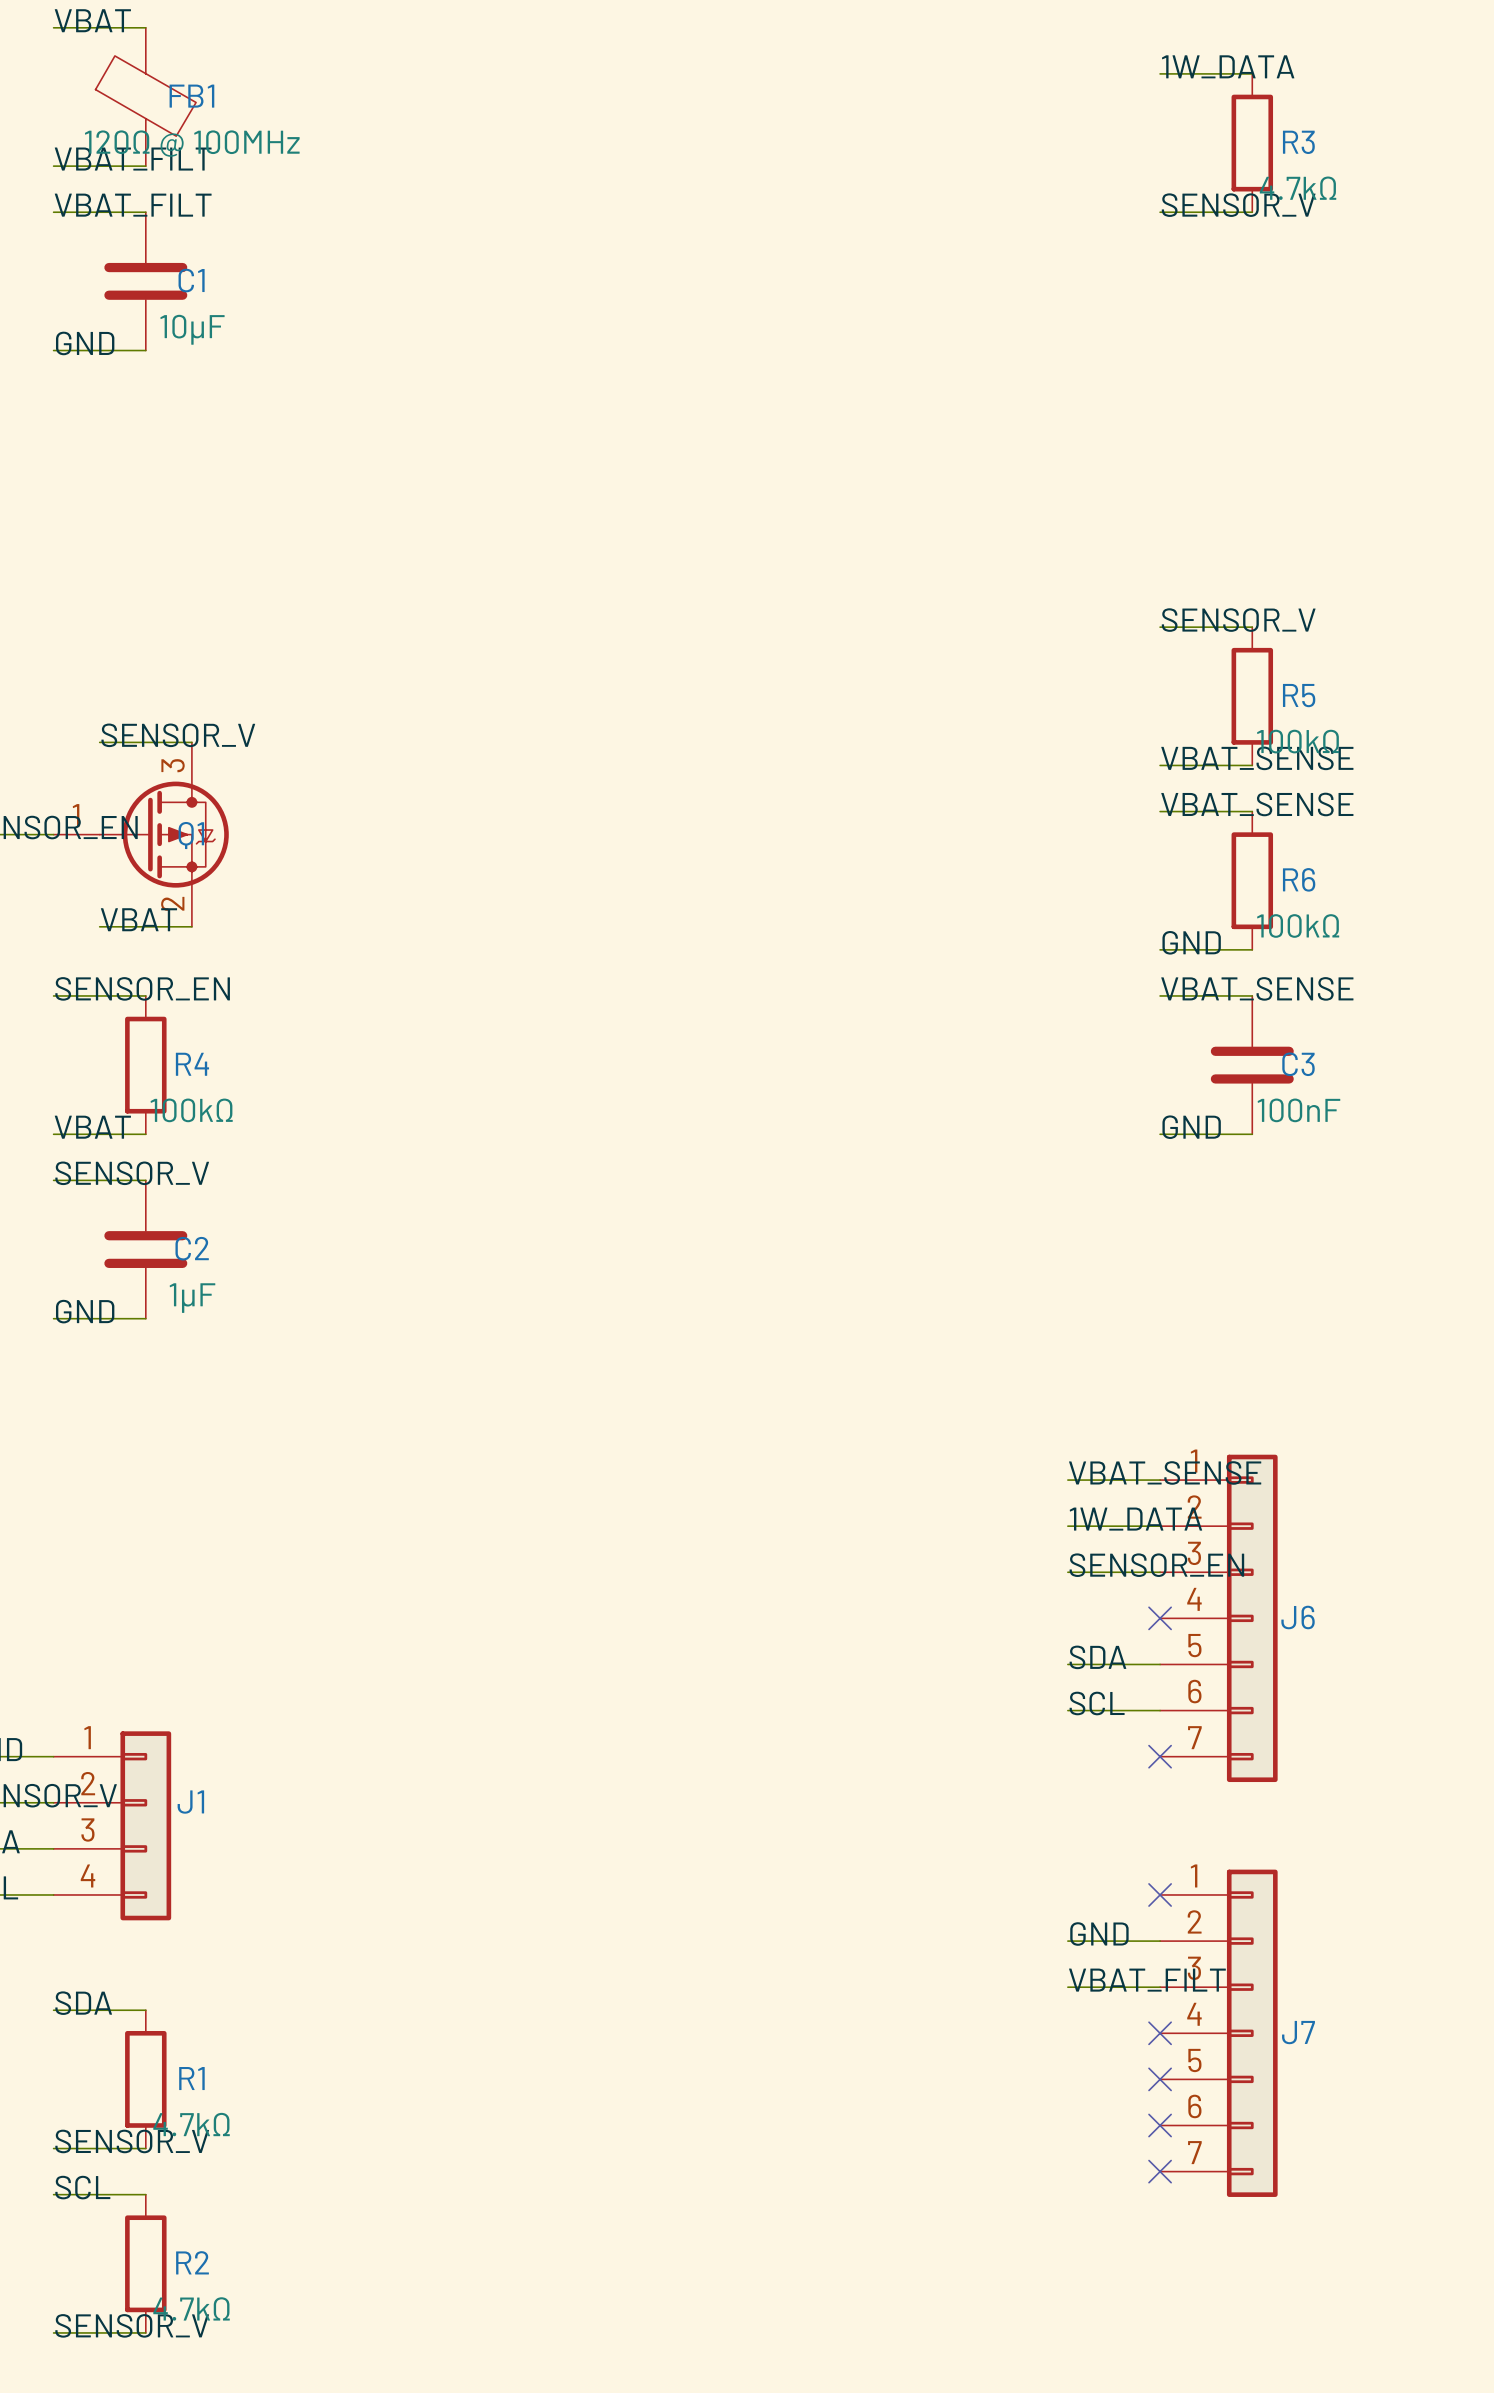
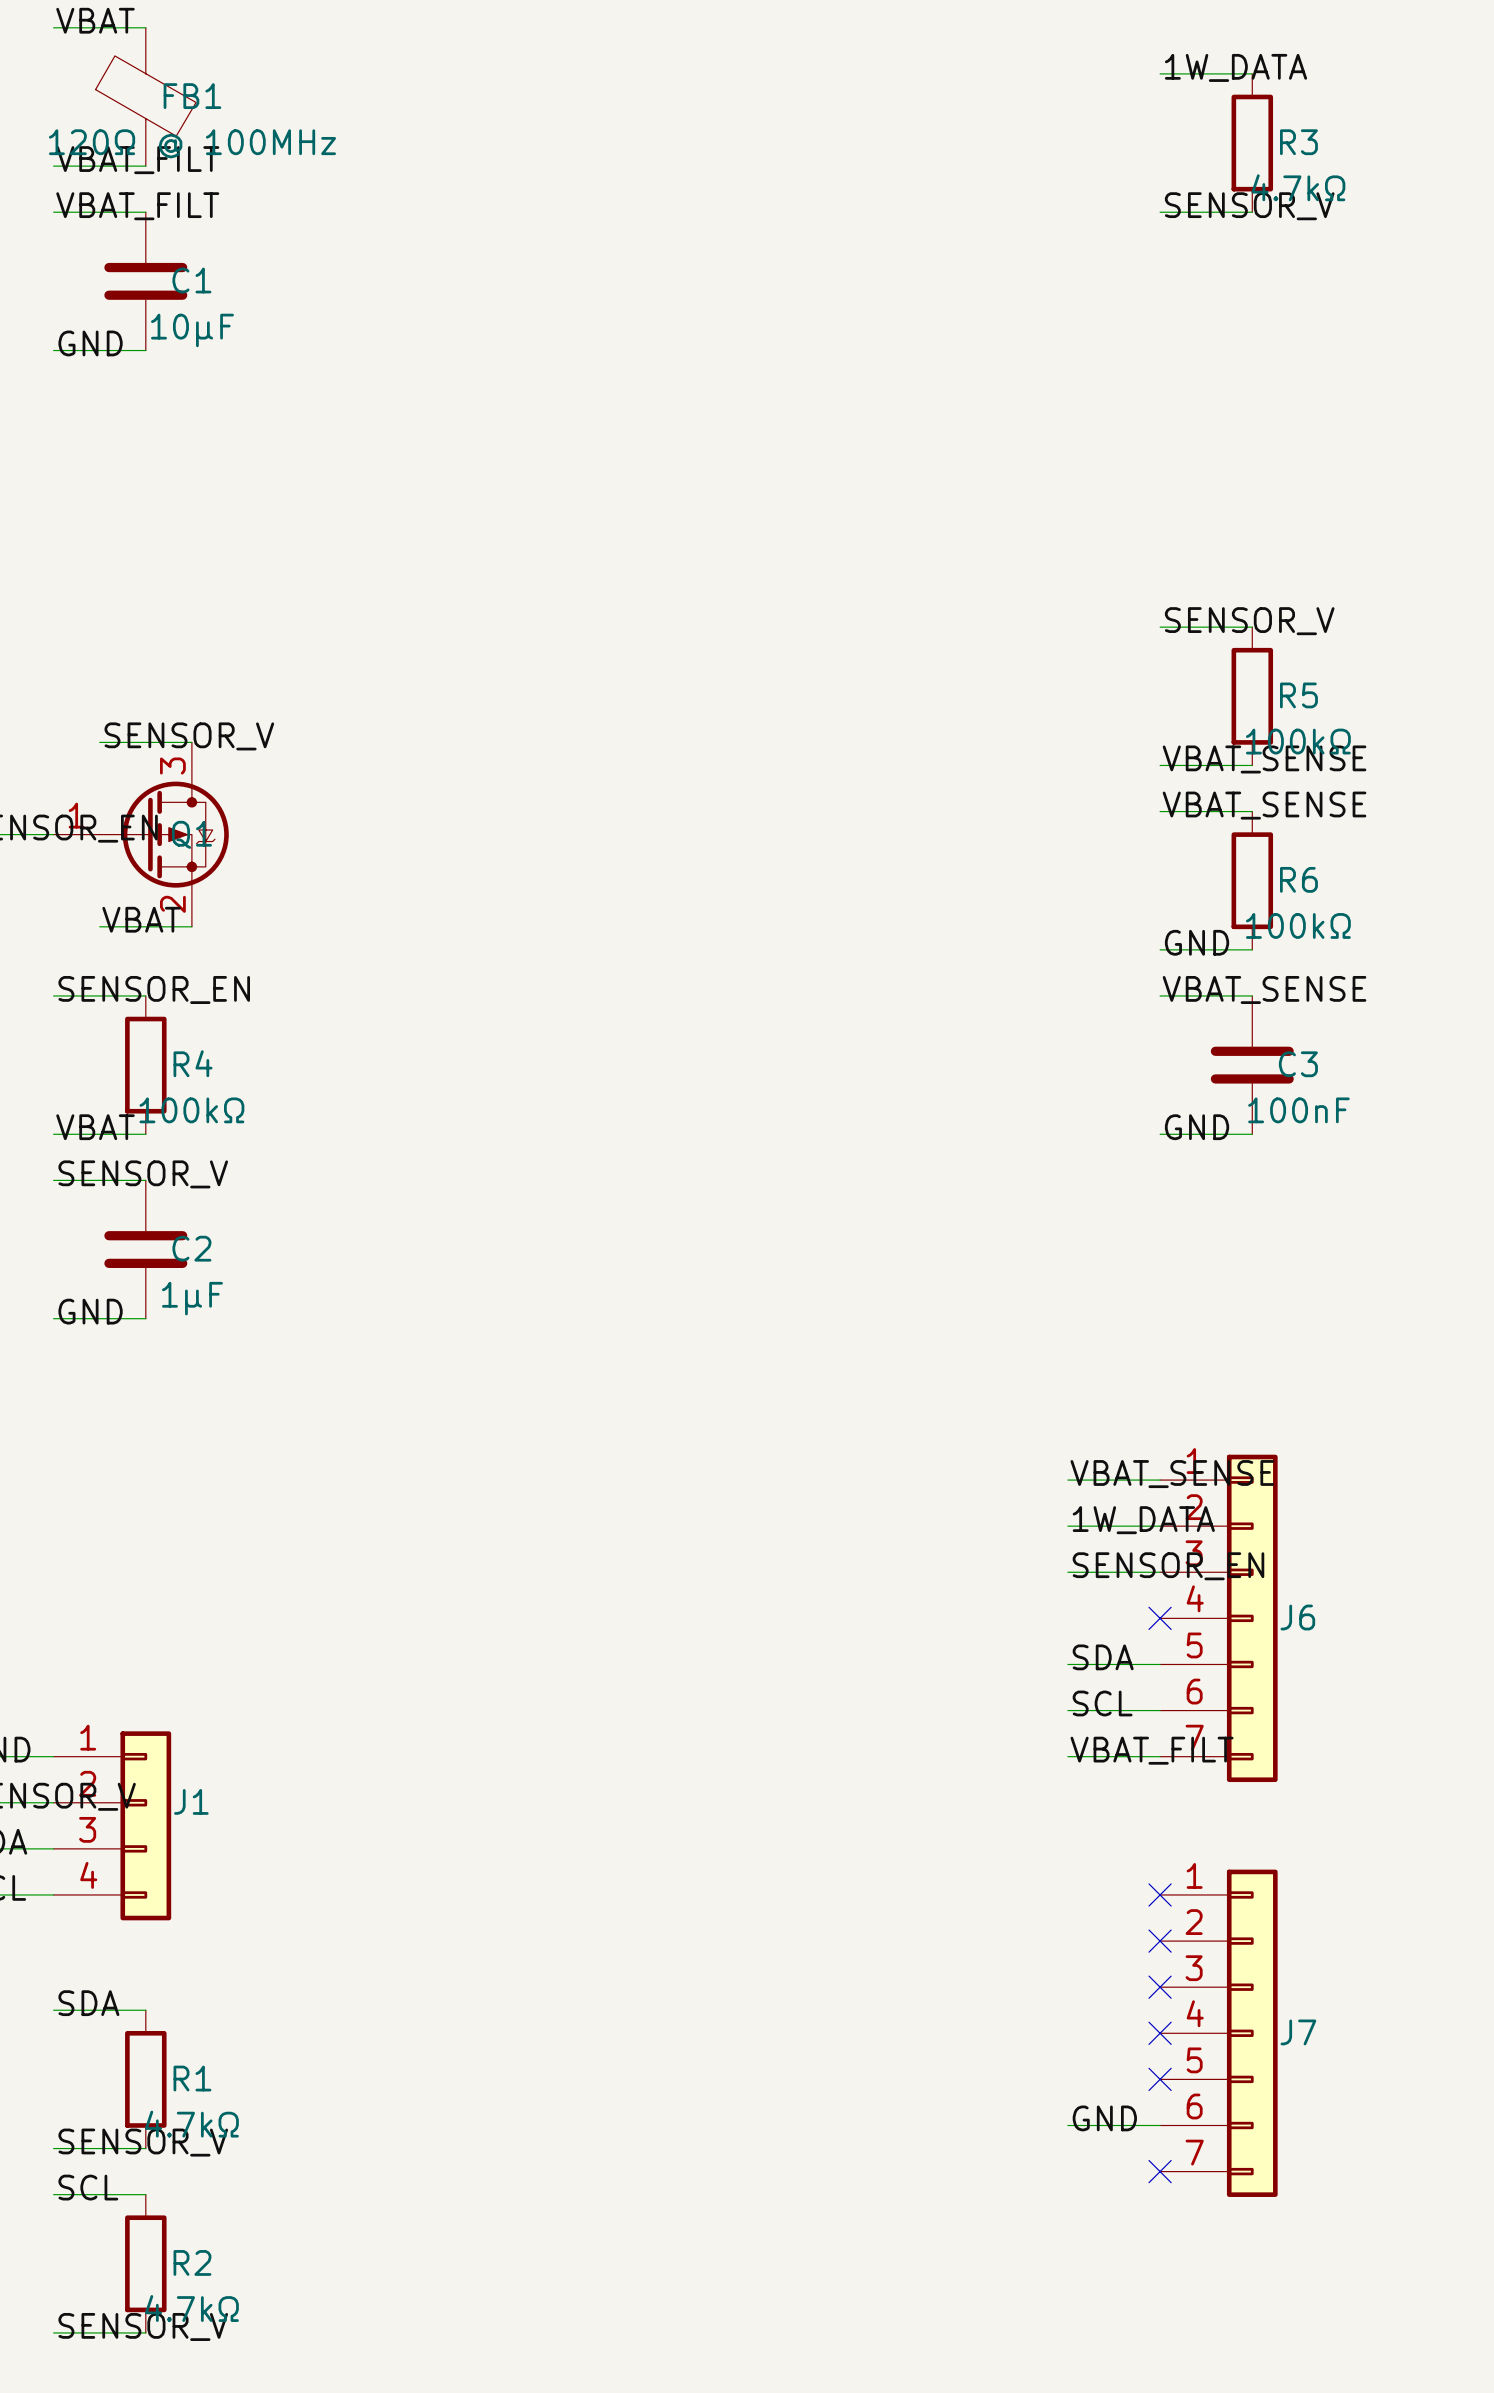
no-connect mark: (1160, 1756) -> none
label position: GND (1099, 1934) -> GND (1104, 2118)
wire: (1067, 1941) (1160, 1941) -> (1067, 1756) (1160, 1756)
no-connect mark: none -> (1160, 1941)
label position: VBAT_FILT (1147, 1980) -> VBAT_FILT (1152, 1750)
wire: (1067, 1987) (1160, 1987) -> (1067, 2125) (1160, 2125)
no-connect mark: none -> (1160, 1987)
no-connect mark: (1160, 2125) -> none

